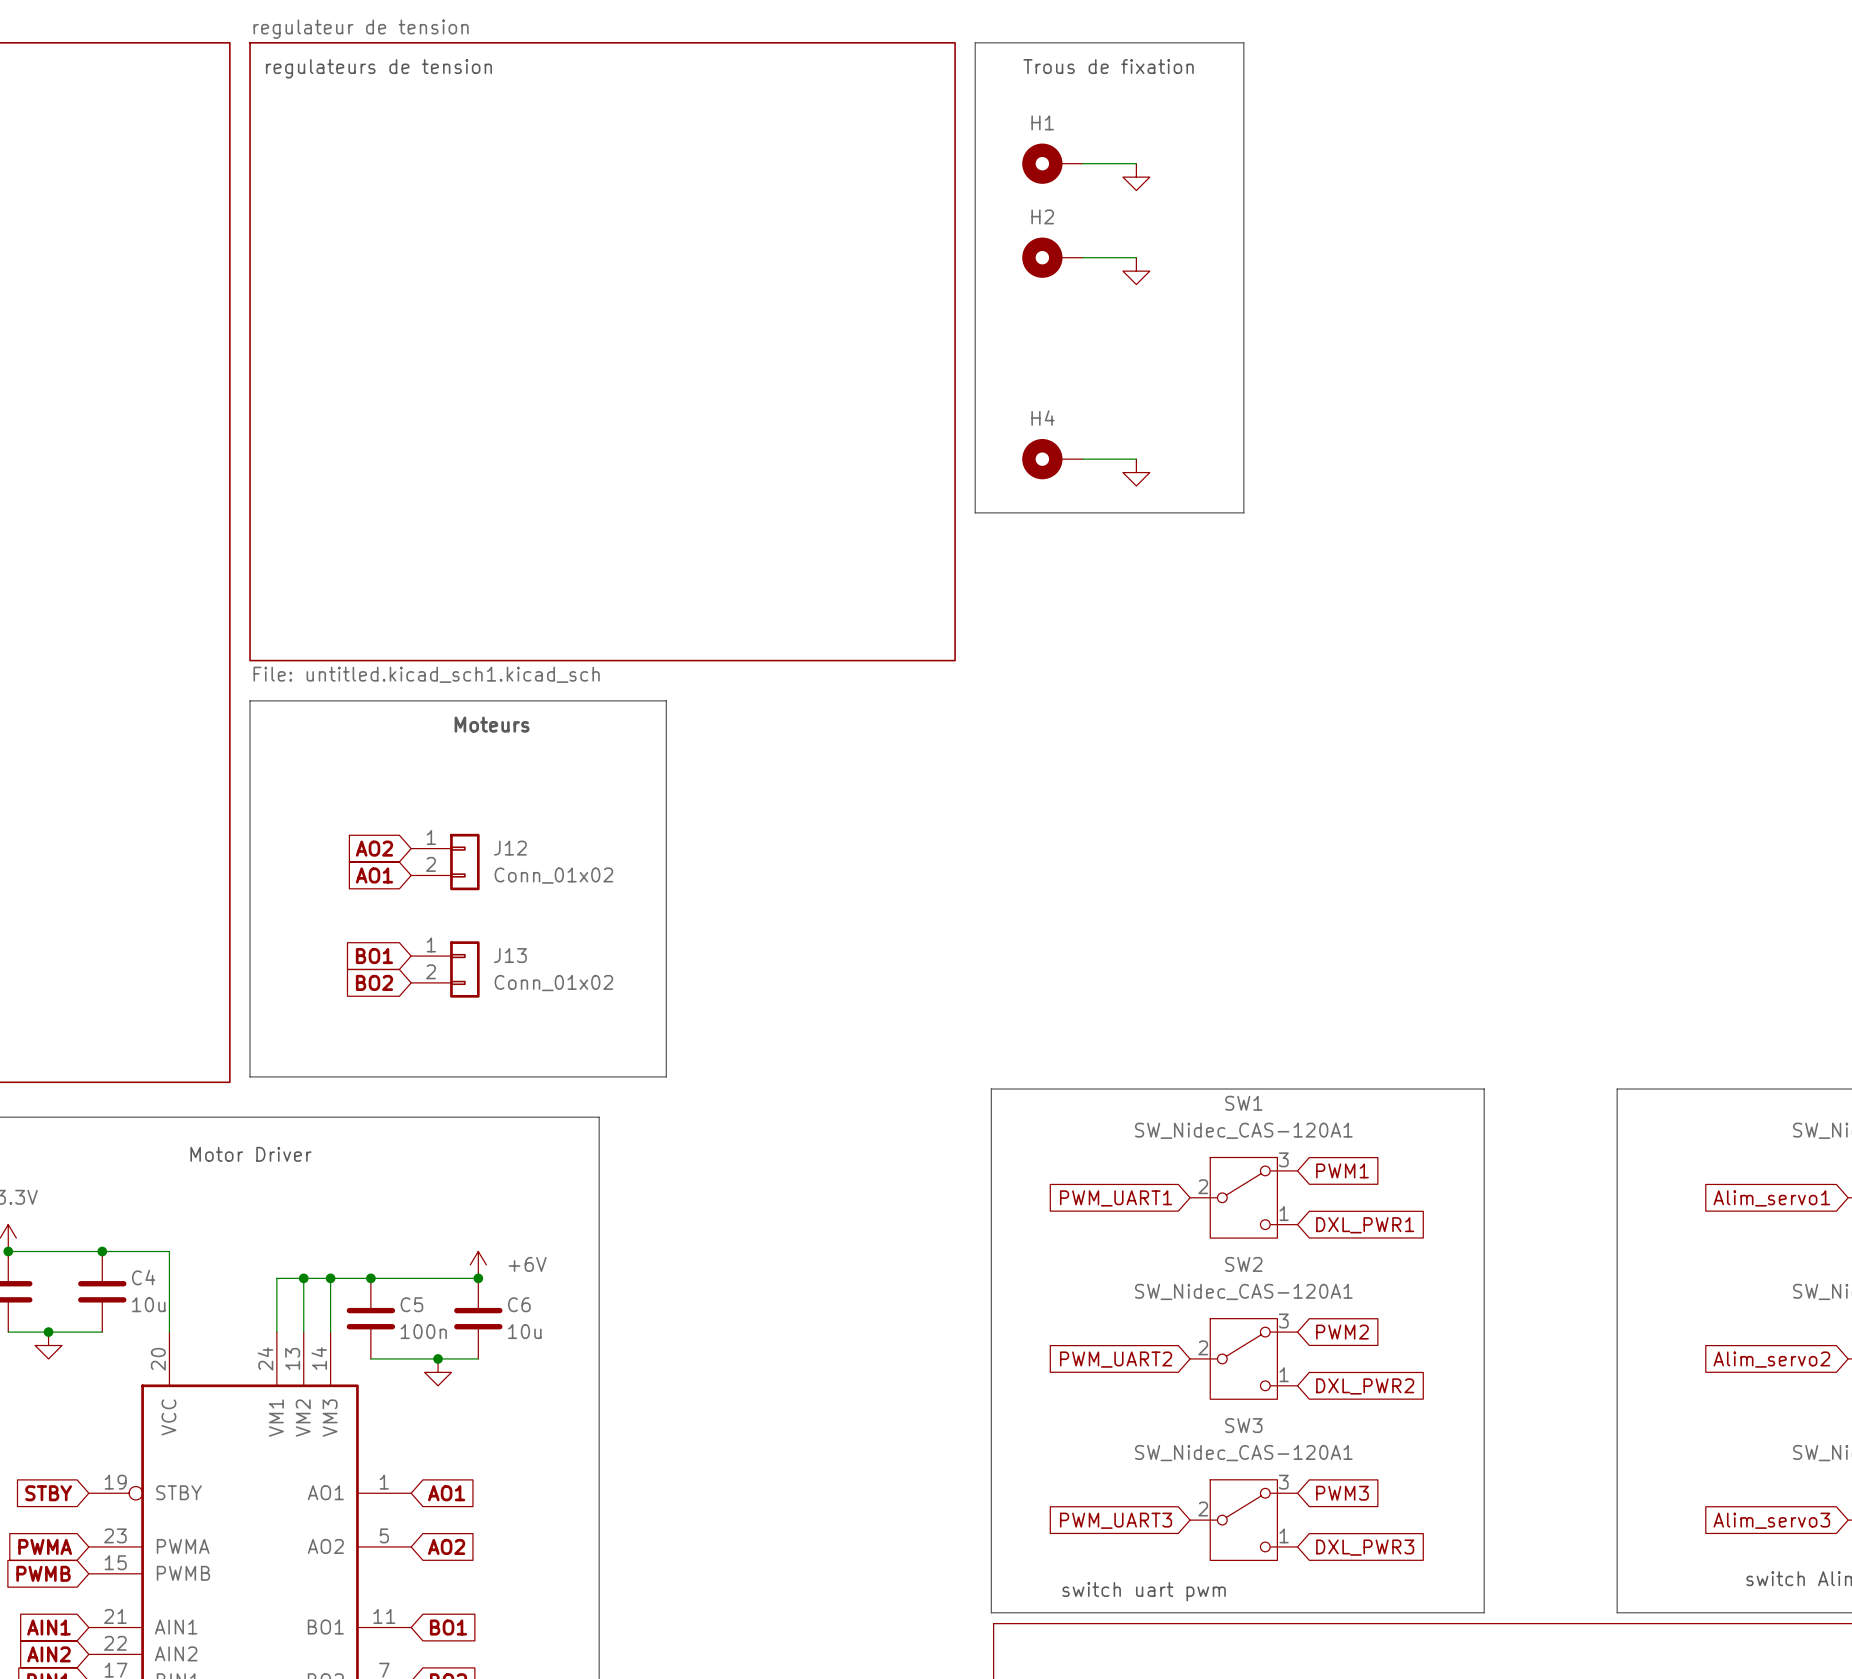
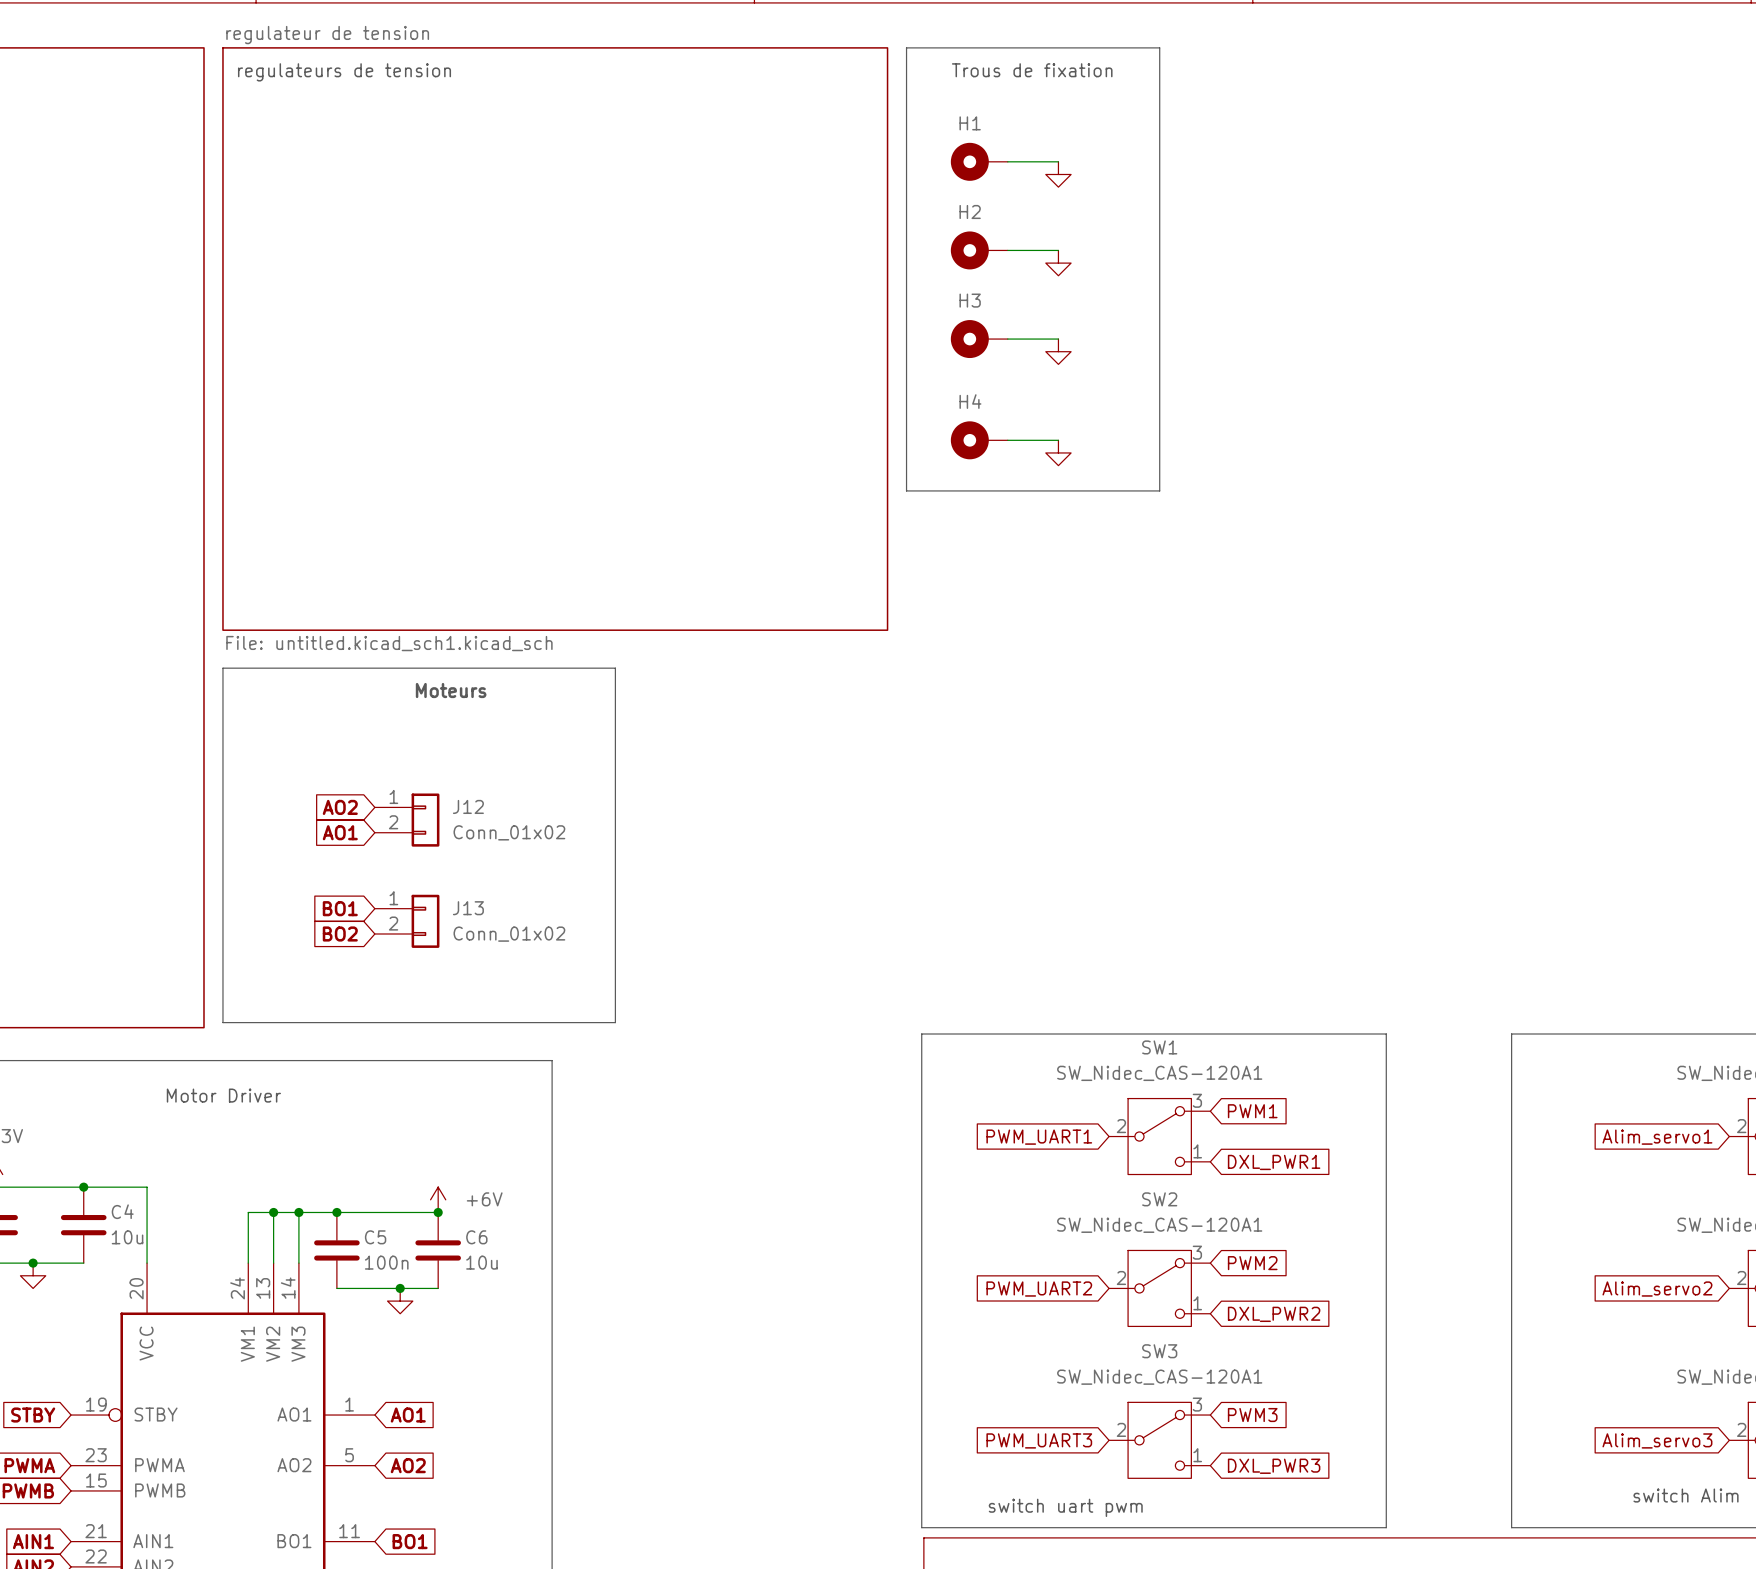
H3: none -> (979, 339)
wire: none -> (1007, 339) (1058, 339)
power symbol: none -> (1058, 351)

